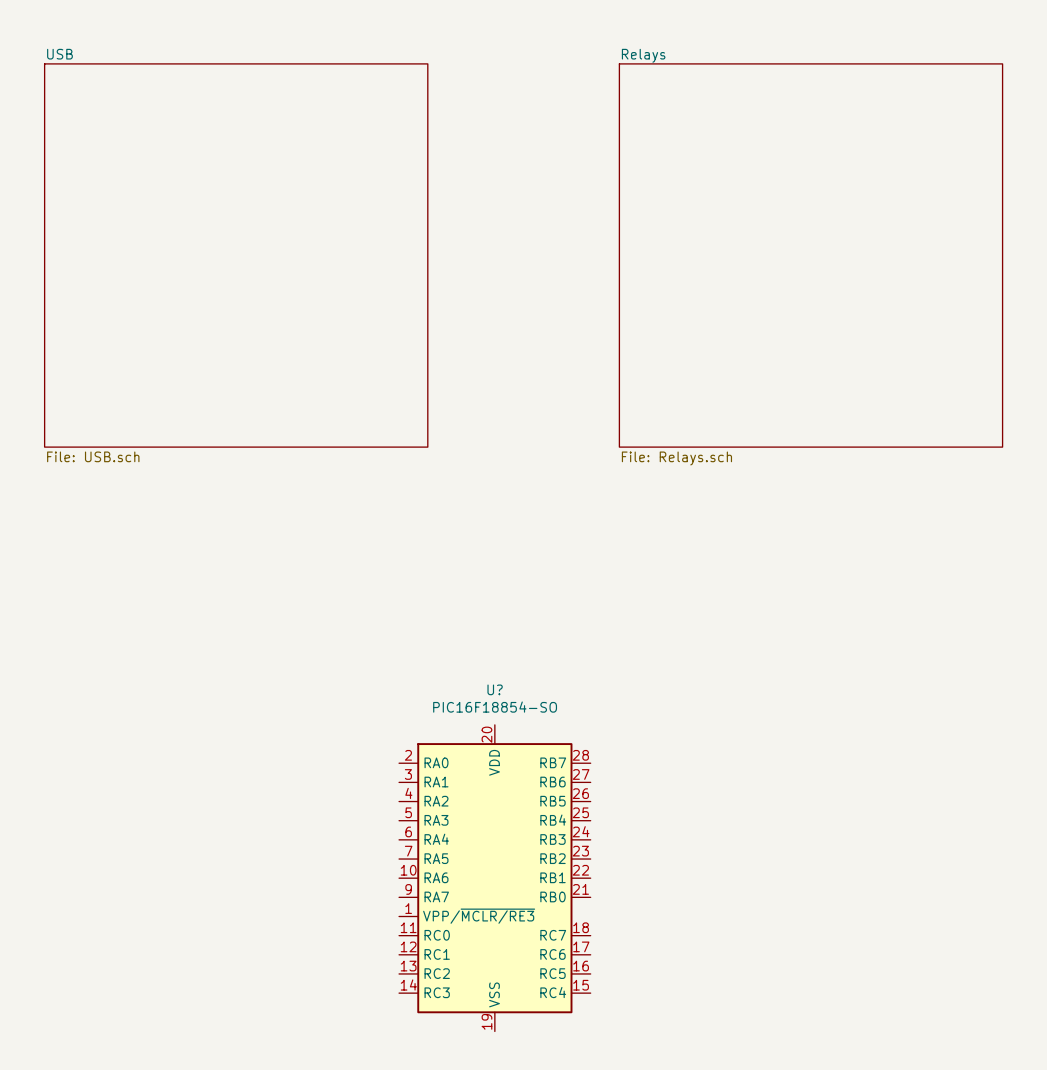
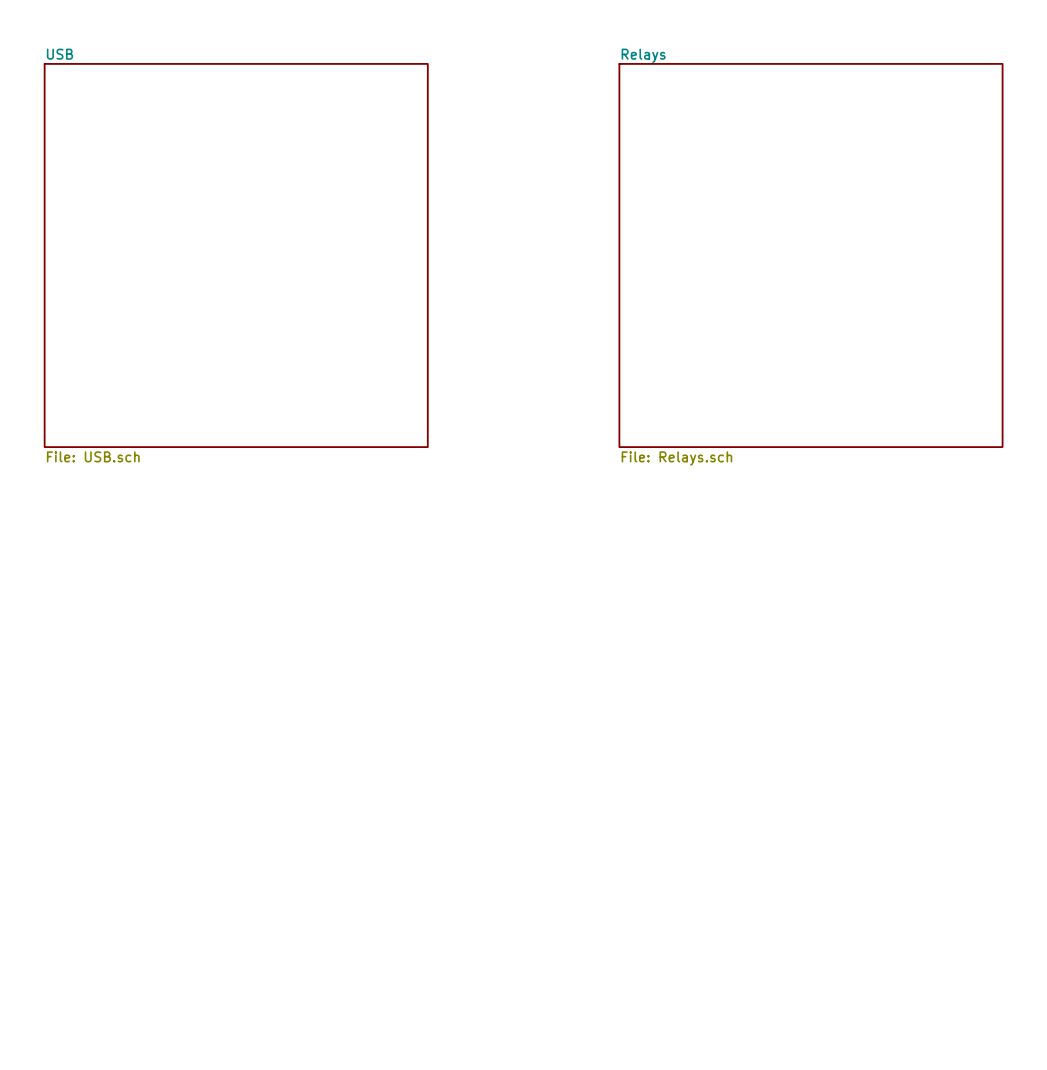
U?: PIC16F18854-SO (494, 878) -> none

